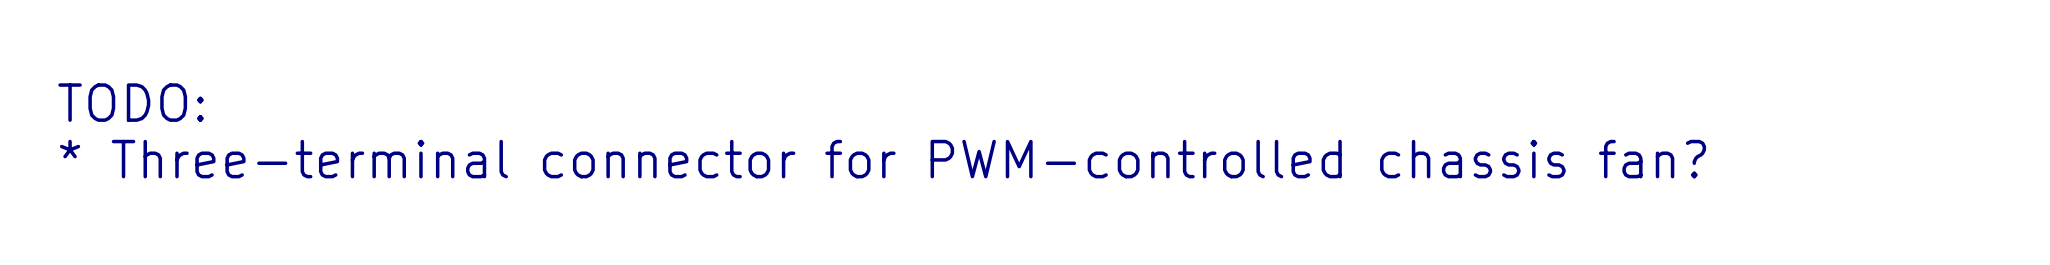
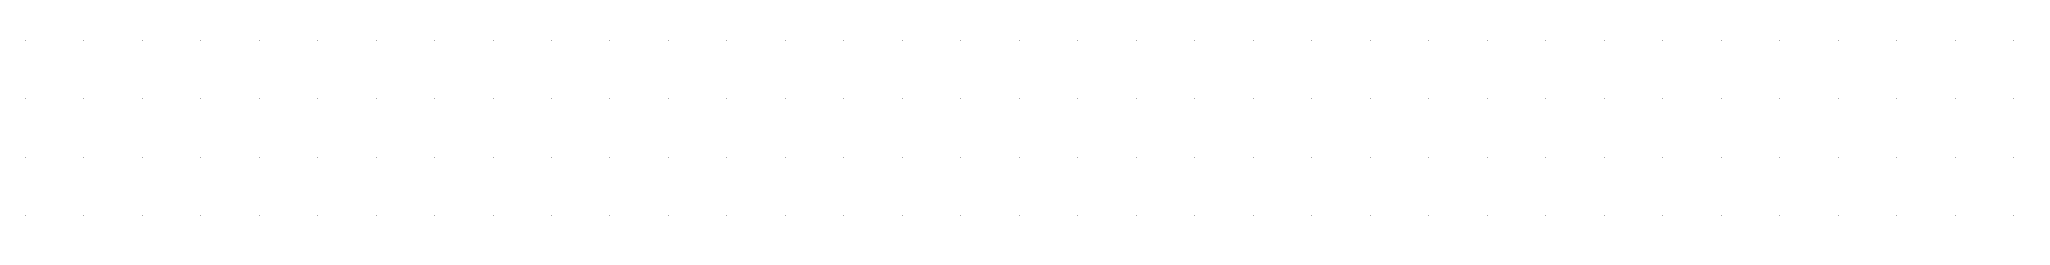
text: TODO: (131, 102) -> none
text: * Three-terminal connector for PWM-controlled chassis fan? (883, 159) -> none

